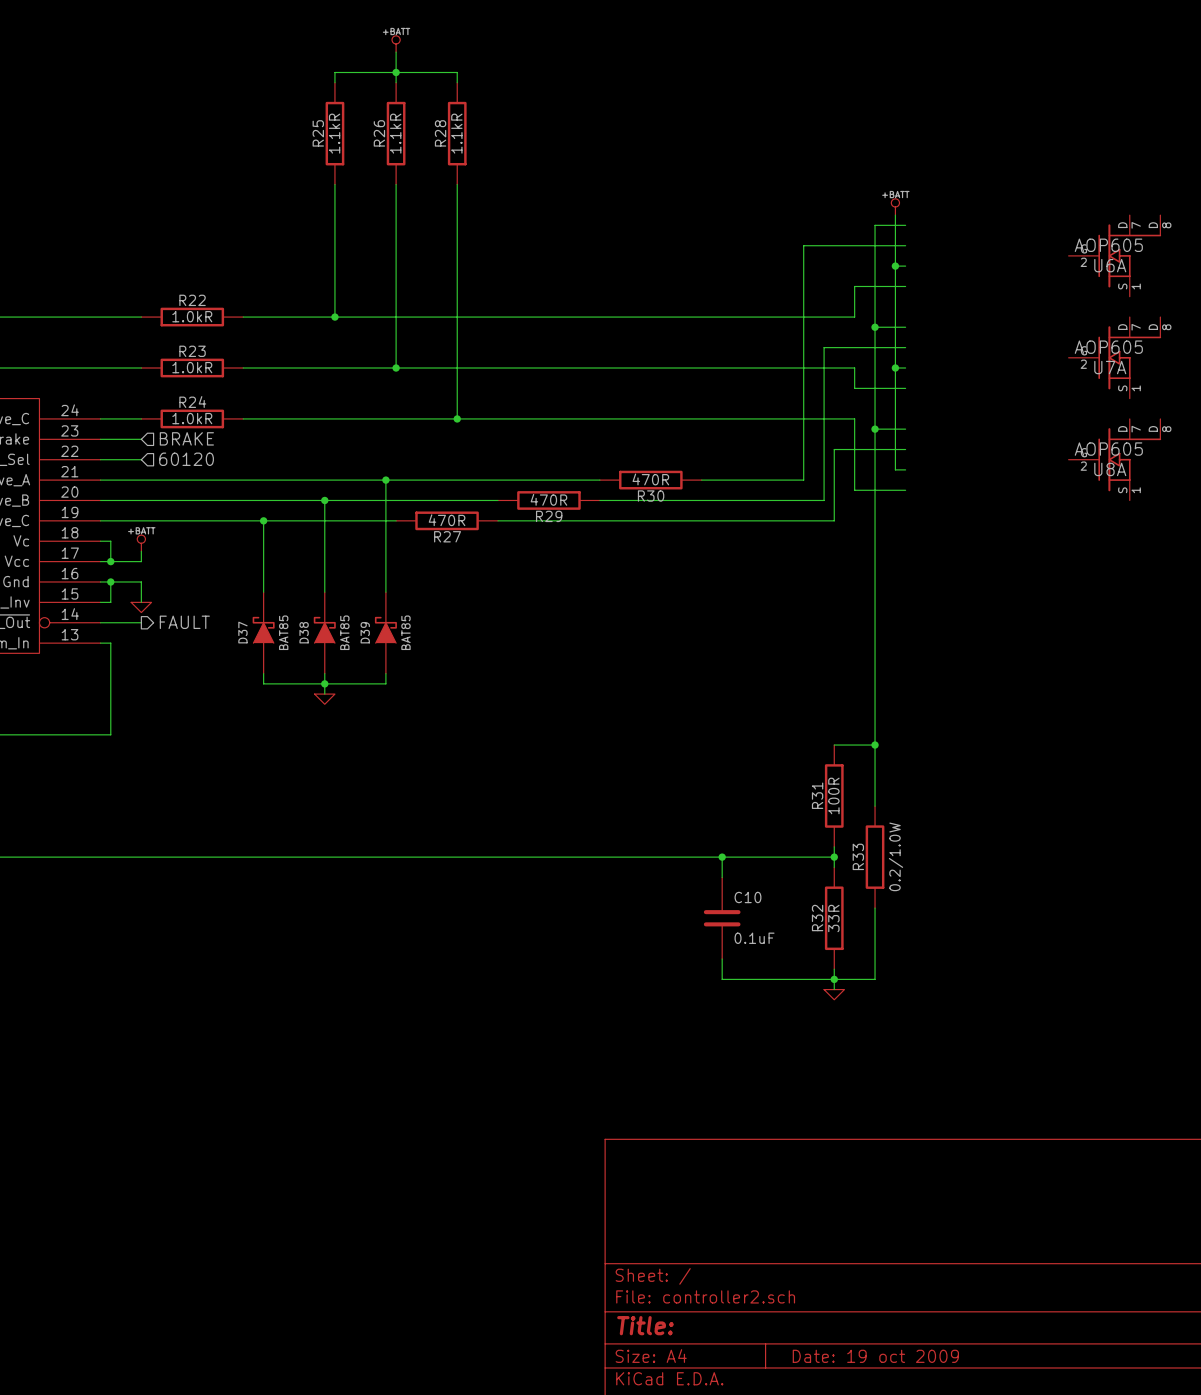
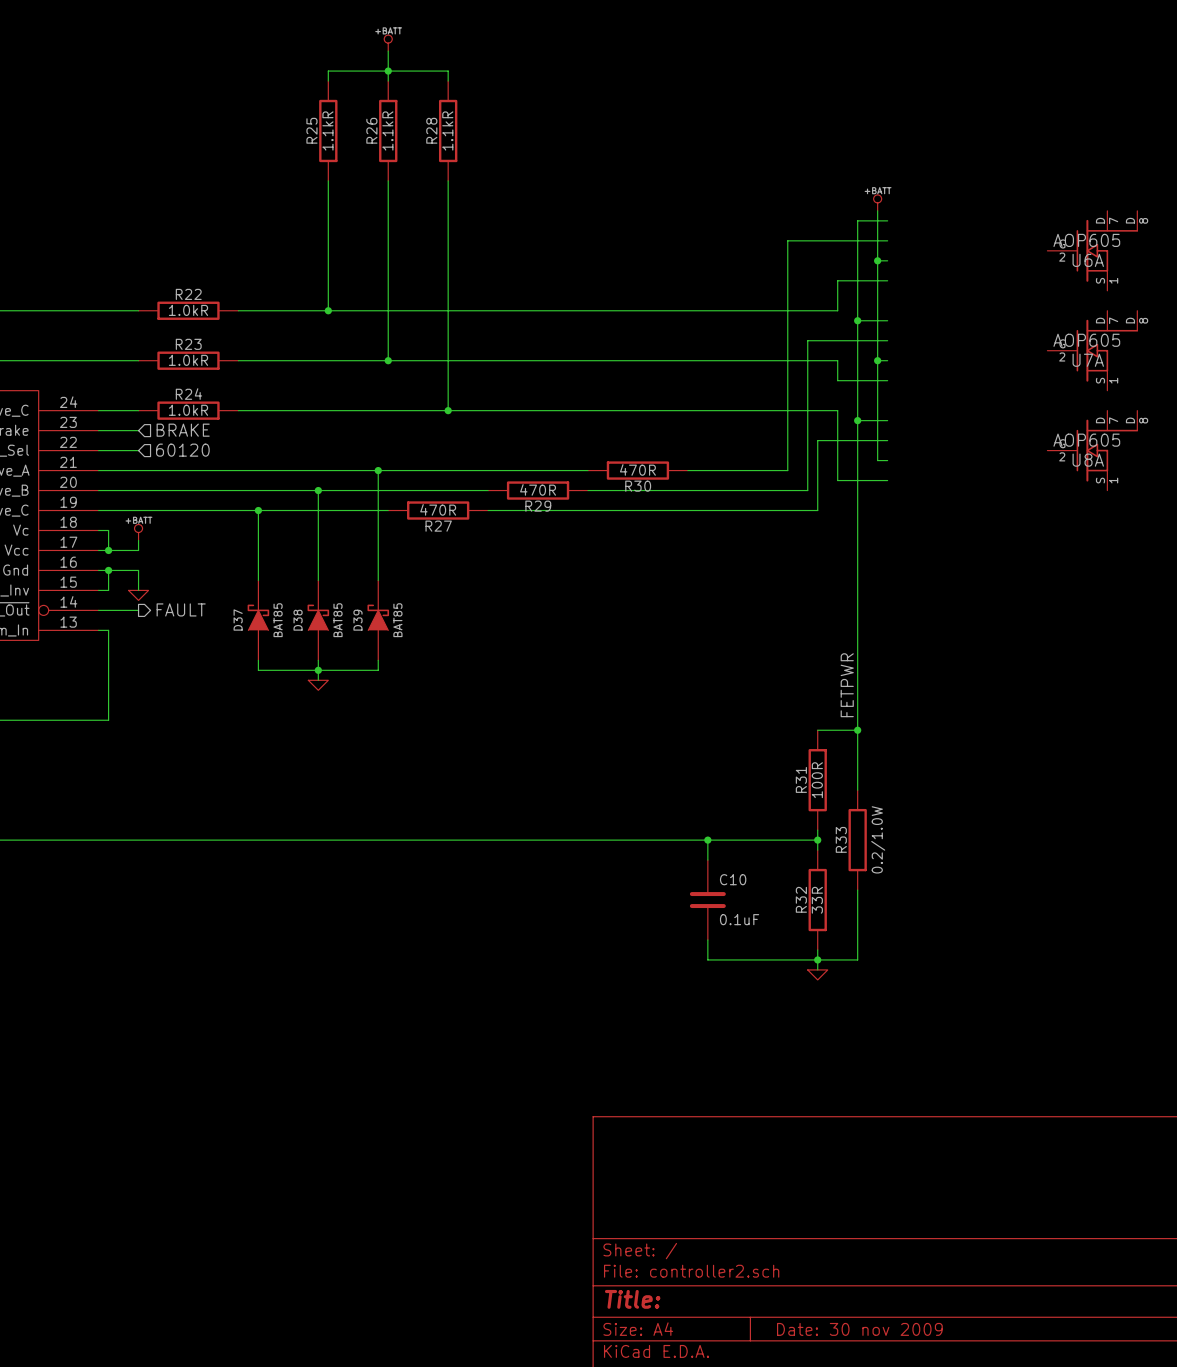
label: none -> FETPWR (847, 685)
title block: Date: 19 oct 2009 (875, 1356) -> Date: 30 nov 2009 (859, 1329)

